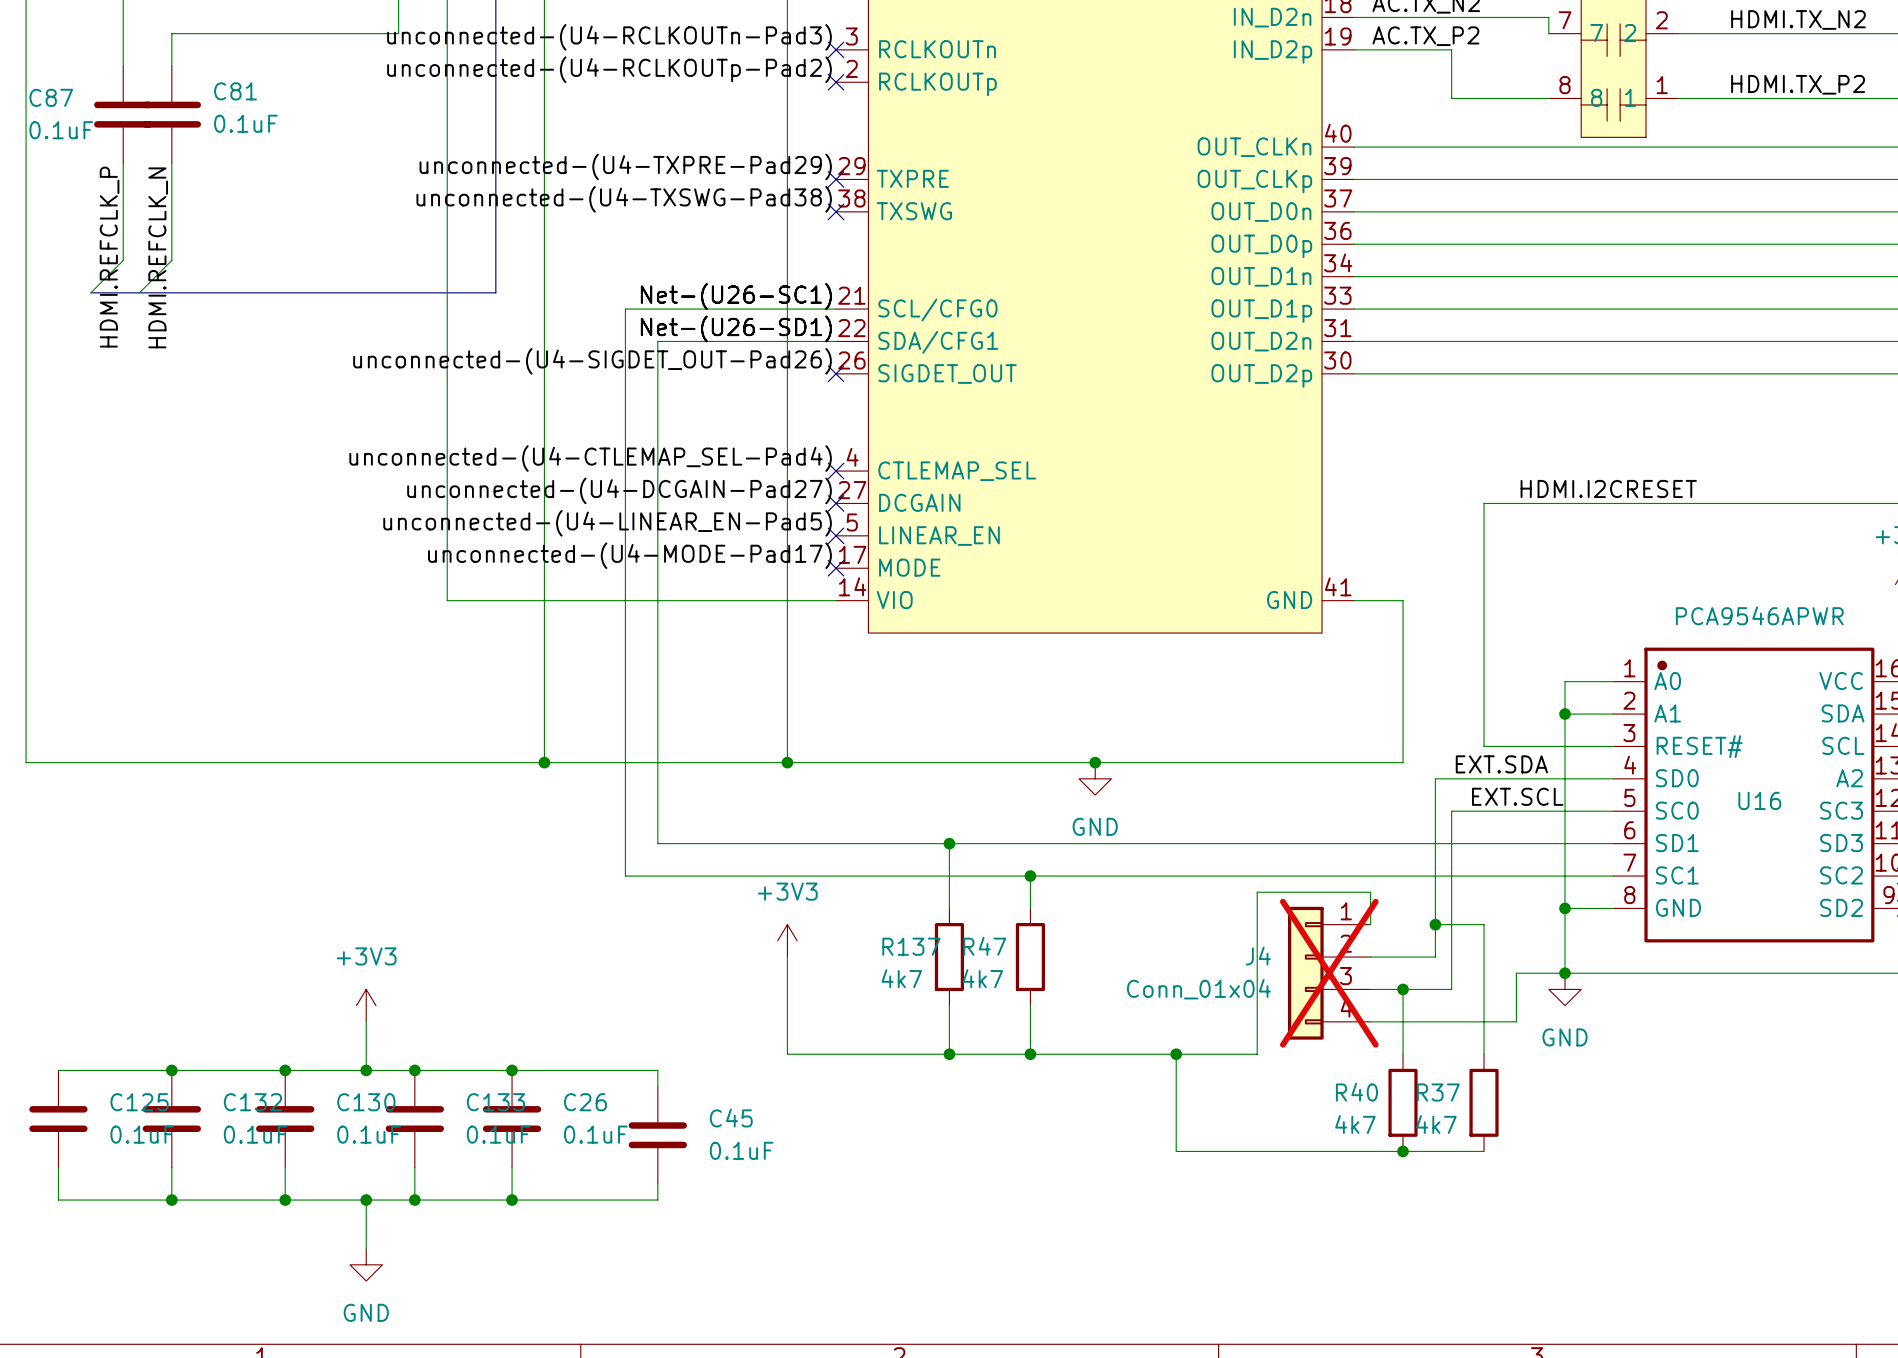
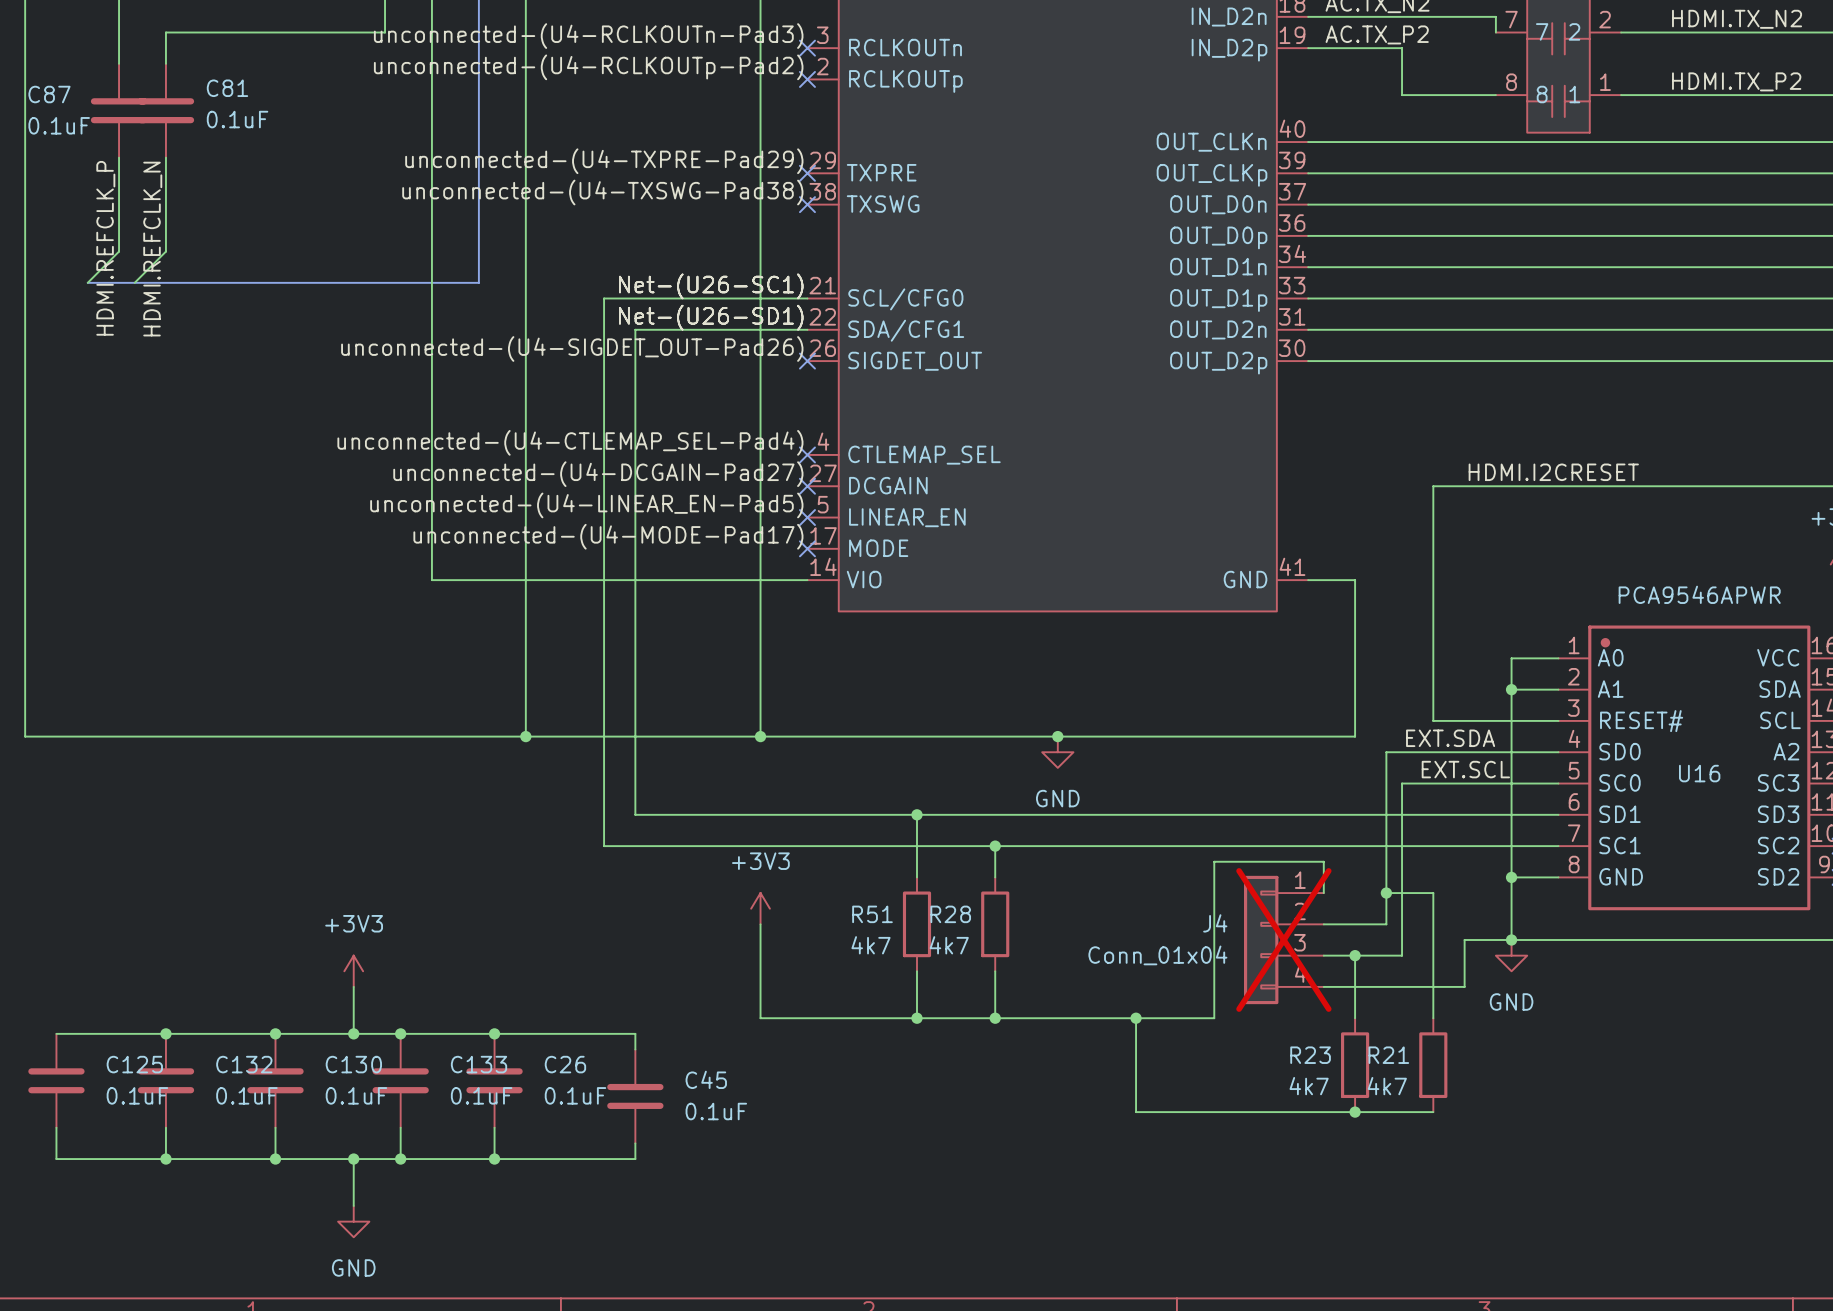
R137 name: R137 (911, 946) -> R51 (872, 914)
R47 name: R47 (984, 946) -> R28 (950, 914)
R40 name: R40 (1356, 1092) -> R23 (1310, 1055)
R37 name: R37 (1438, 1092) -> R21 (1388, 1055)

